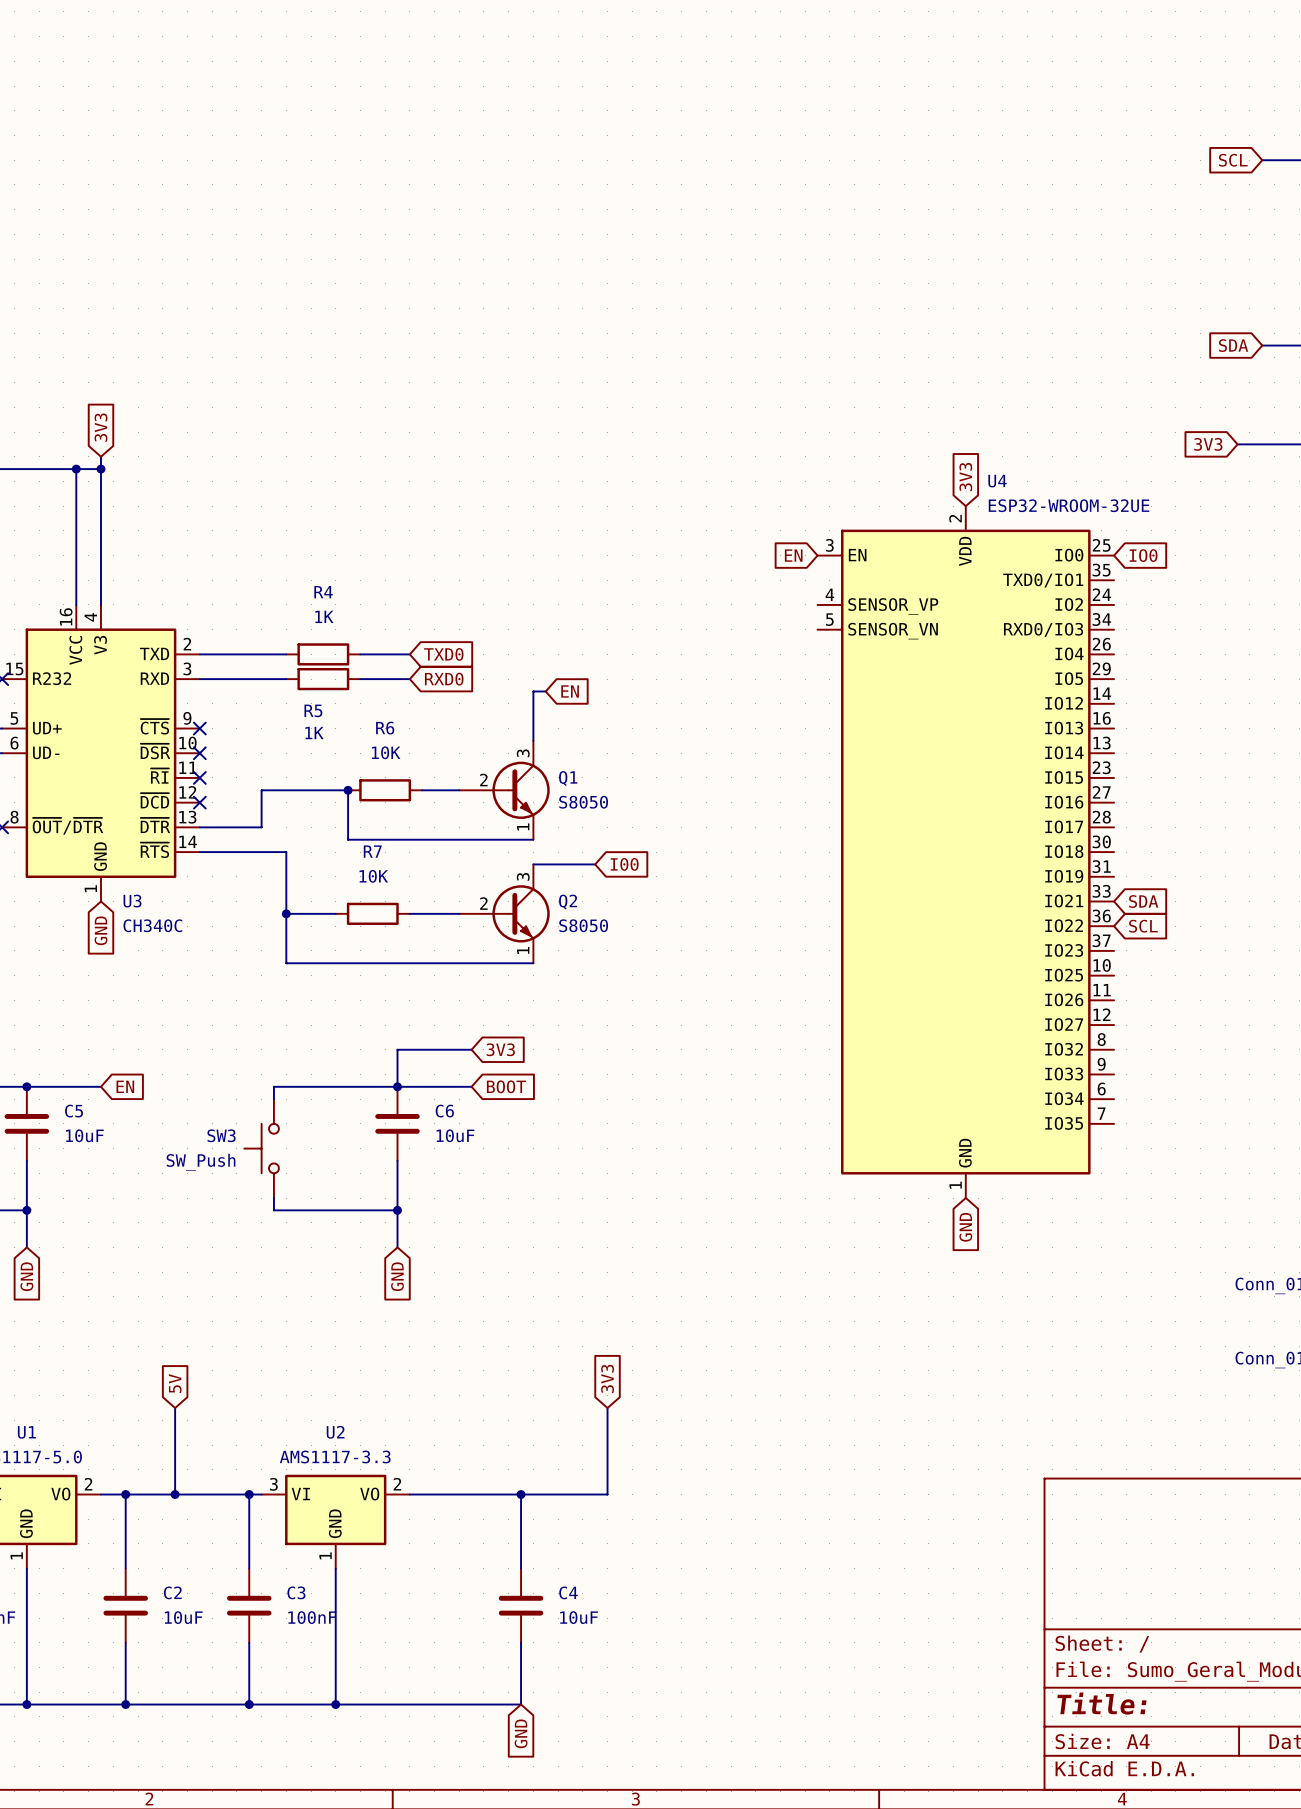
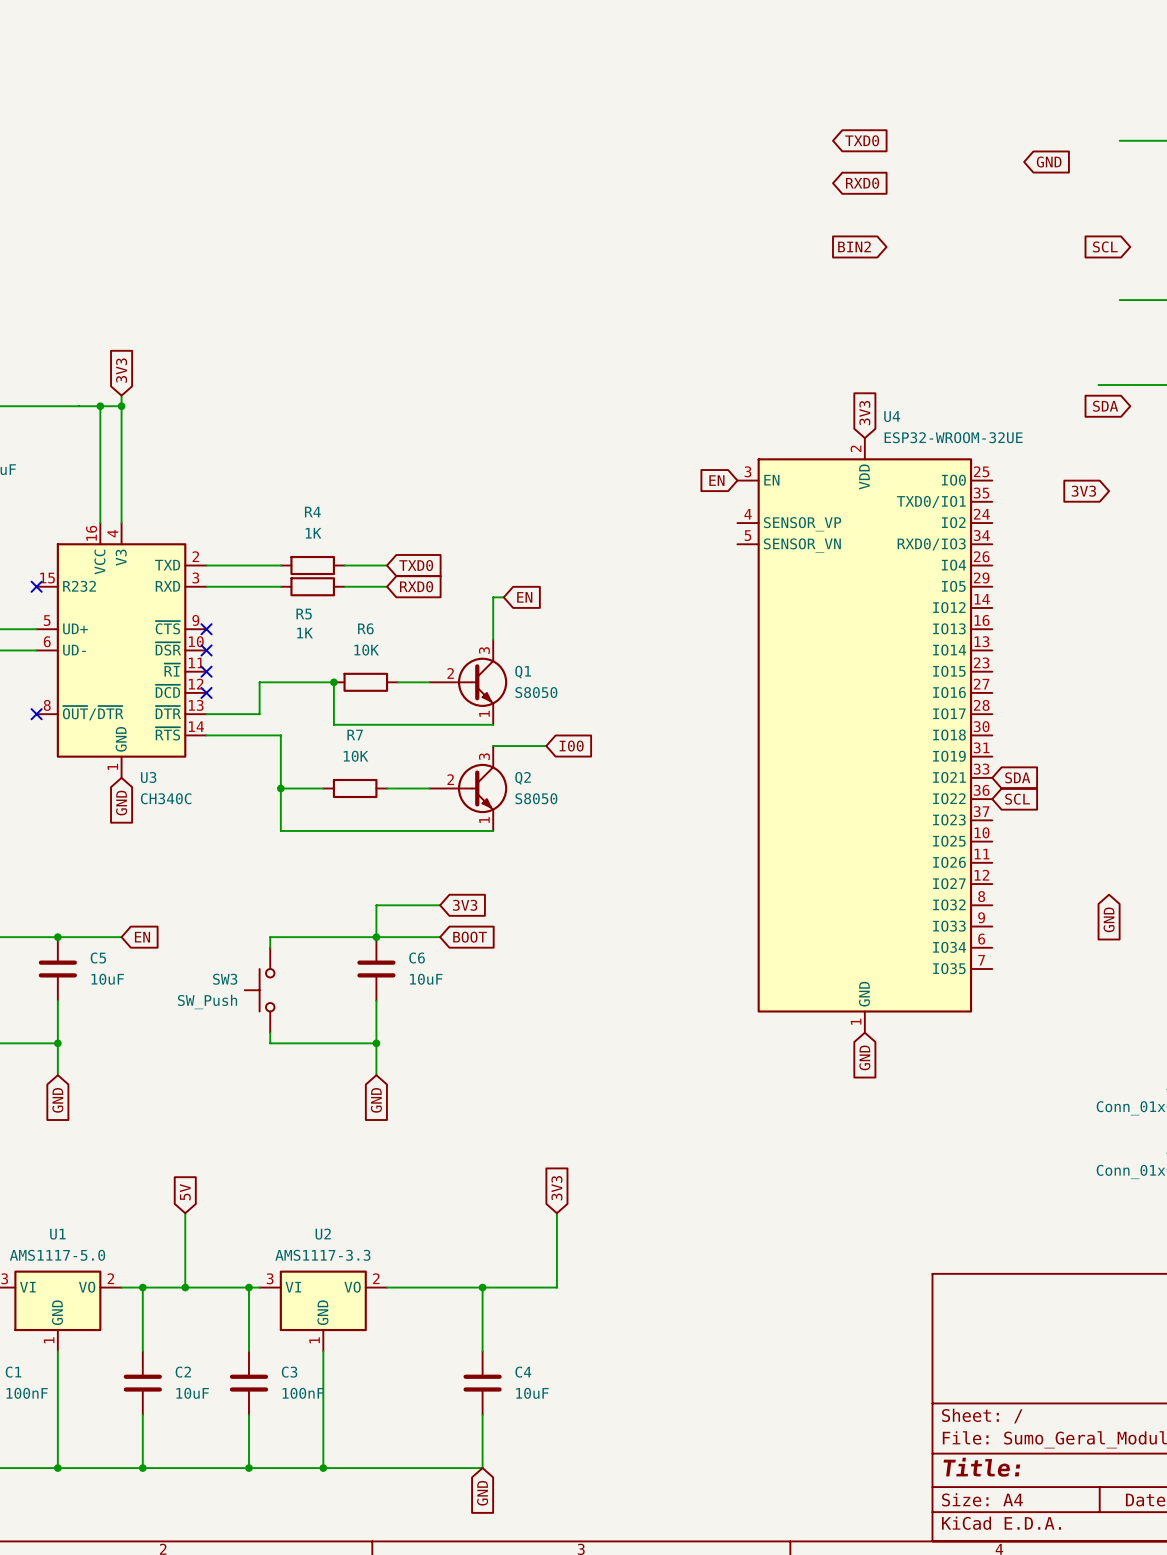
global label: none -> TXD0 (862, 140)
global label position: SCL (1233, 160) -> SCL (1105, 246)
global label: none -> GND (1049, 162)
global label: none -> RXD0 (862, 183)
global label: none -> BIN2 (854, 246)
global label position: SDA (1233, 345) -> SDA (1105, 406)
global label position: 3V3 (1208, 444) -> 3V3 (1083, 491)
global label: IO0 (1143, 555) -> none
global label: none -> GND (1109, 919)

